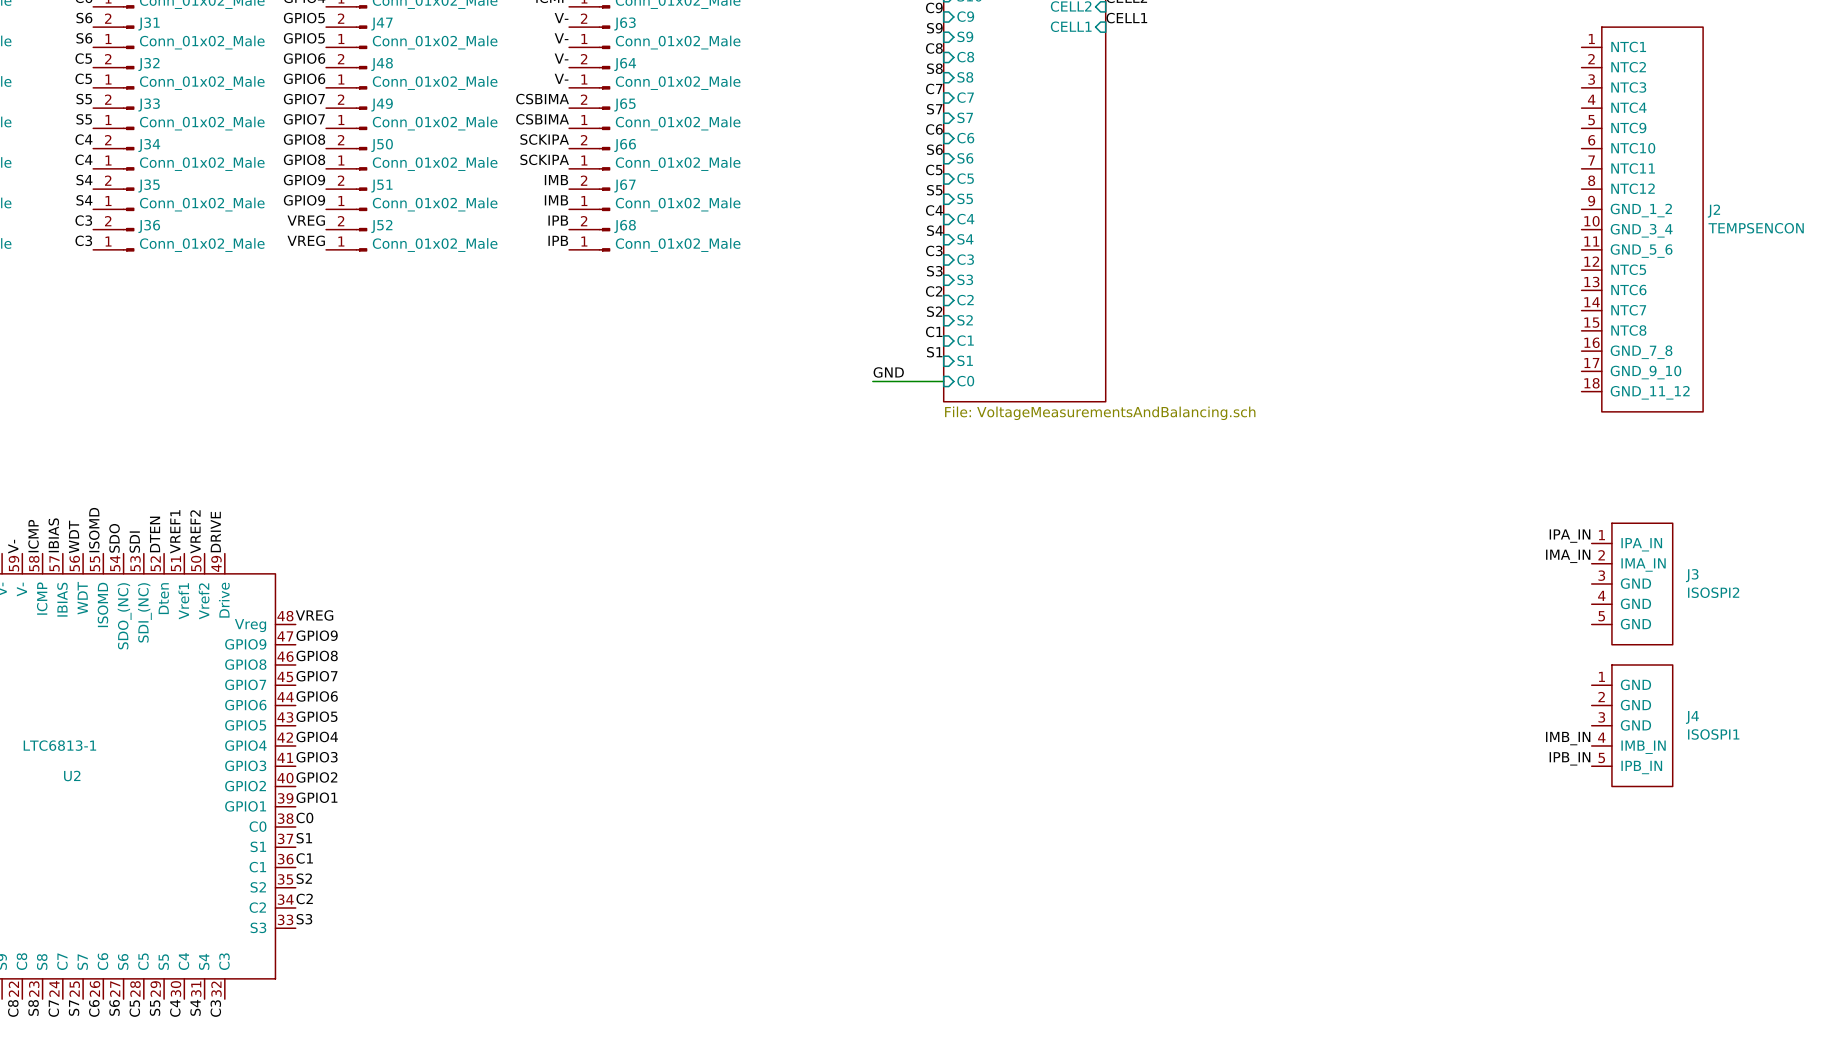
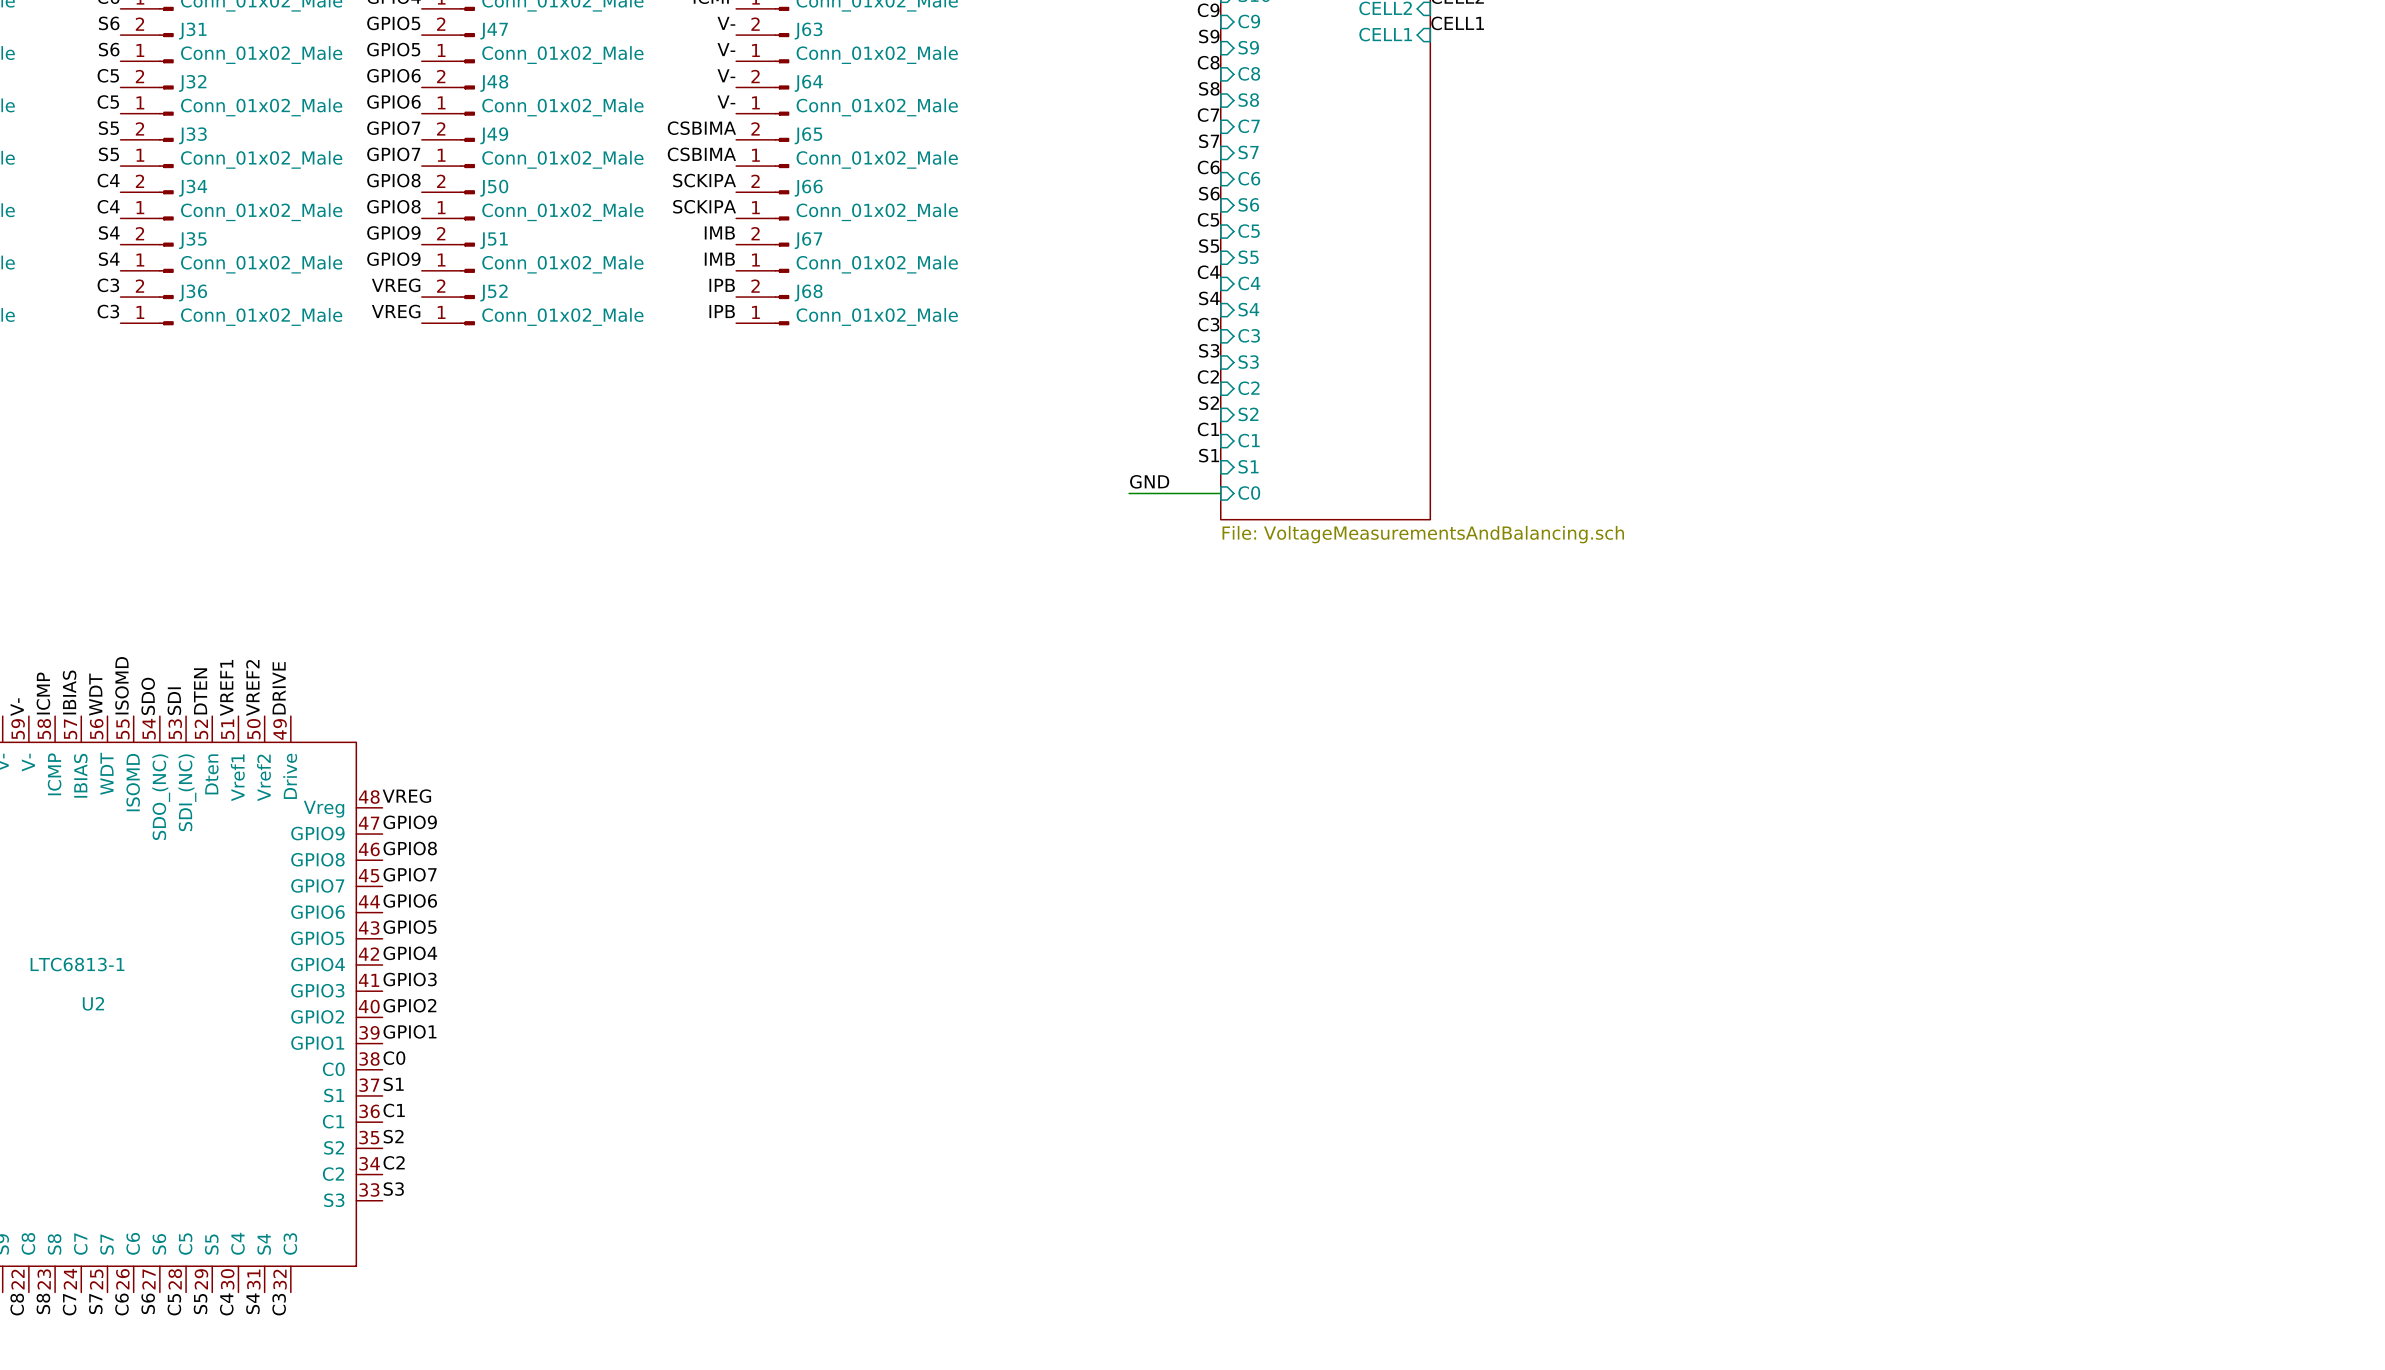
J2: TEMPSENCON (1642, 219) -> none
label: IPA_IN (1570, 536) -> none
label: IMA_IN (1568, 556) -> none
J3: ISOSPI2 (1632, 583) -> none
J4: ISOSPI1 (1632, 725) -> none
label: IMB_IN (1568, 738) -> none
label: IPB_IN (1569, 758) -> none

